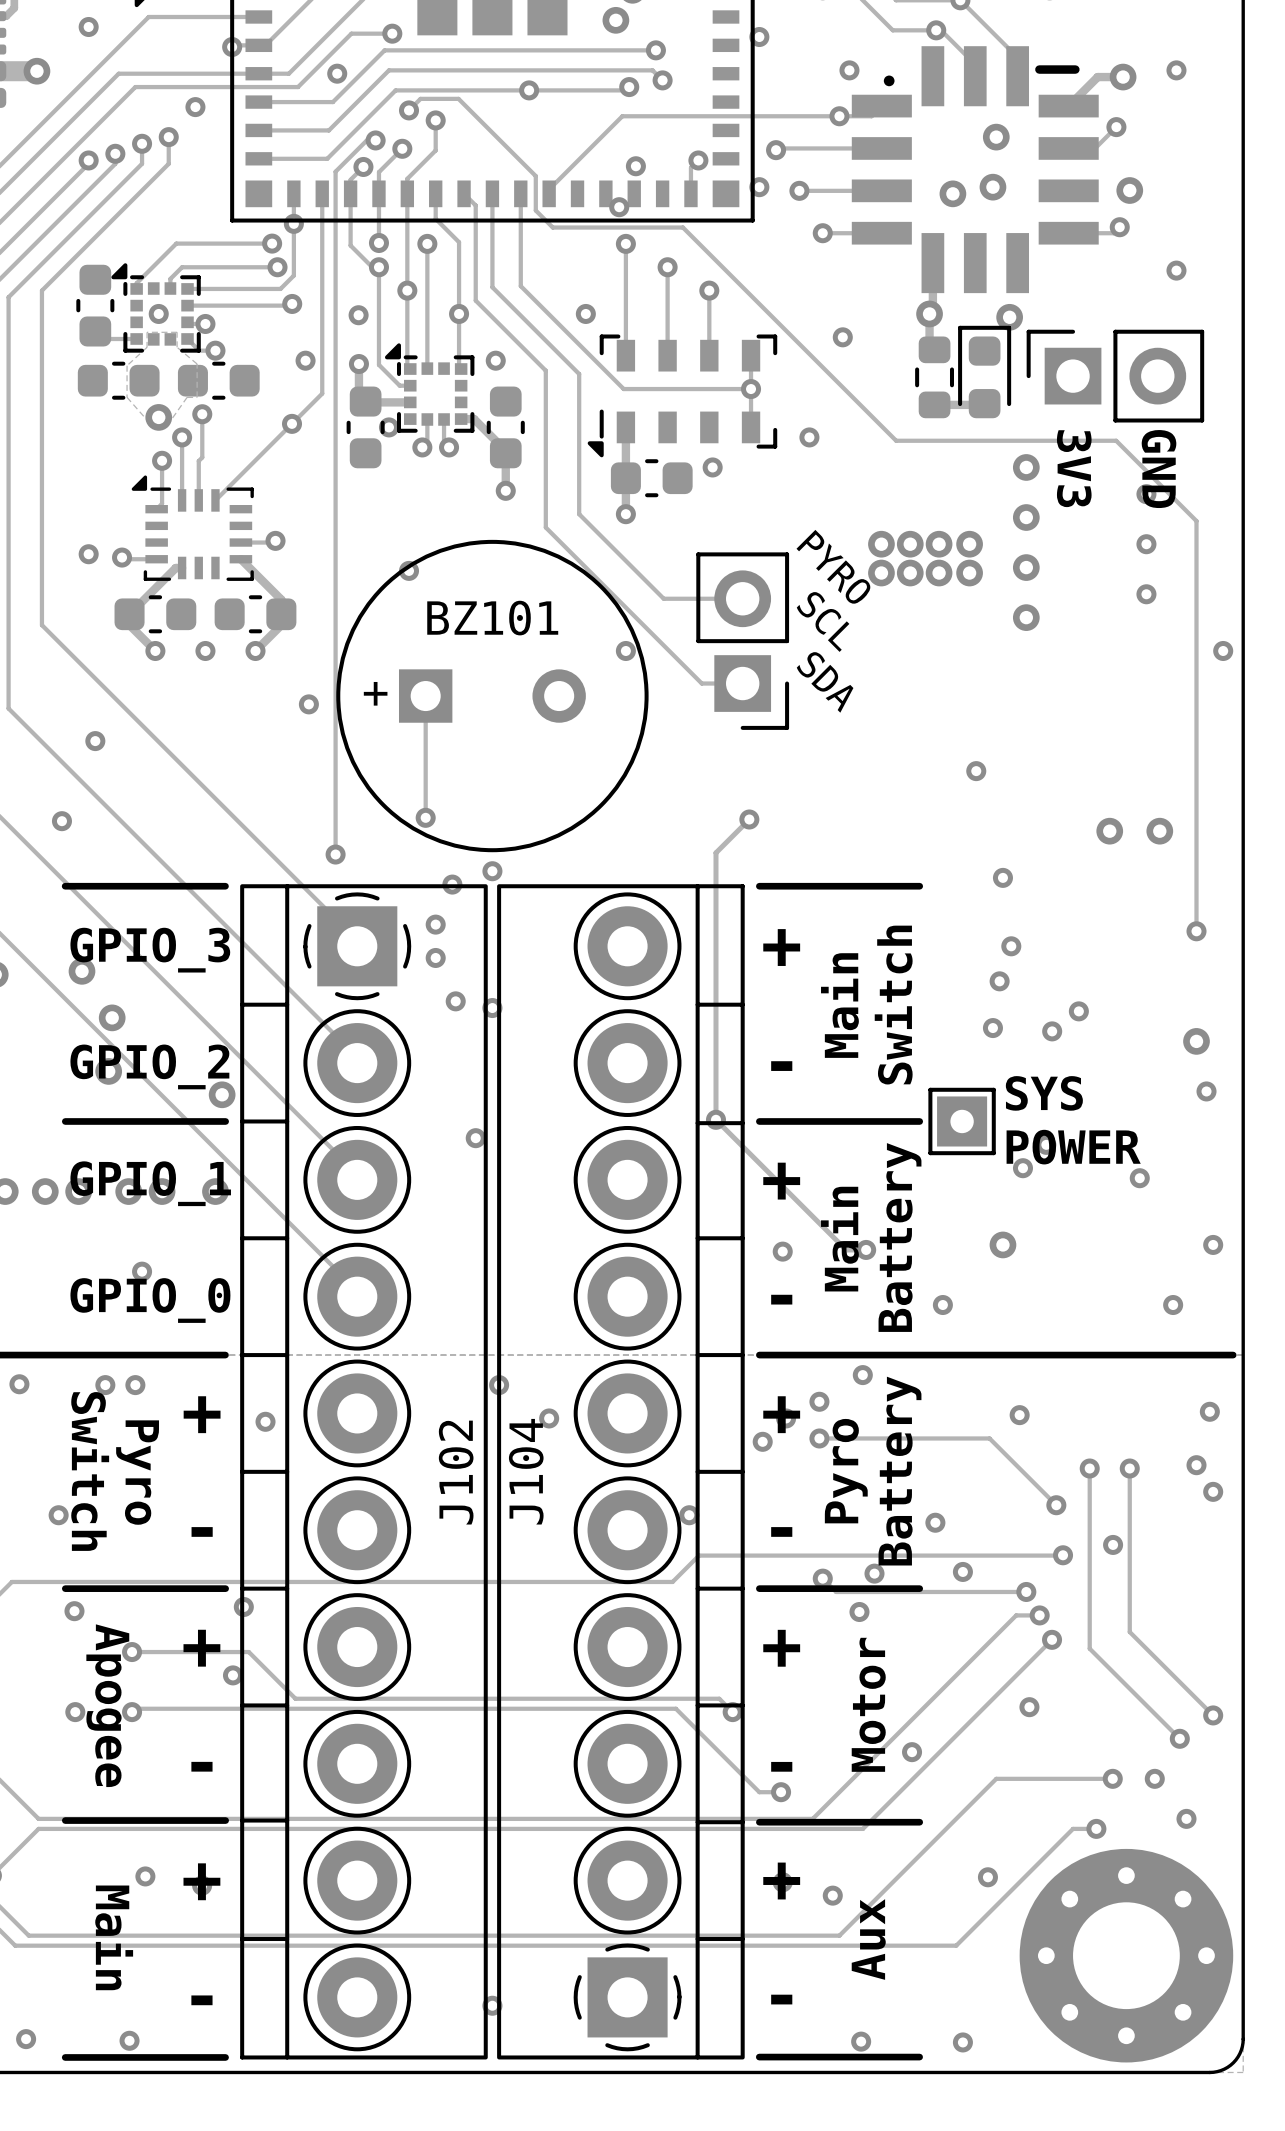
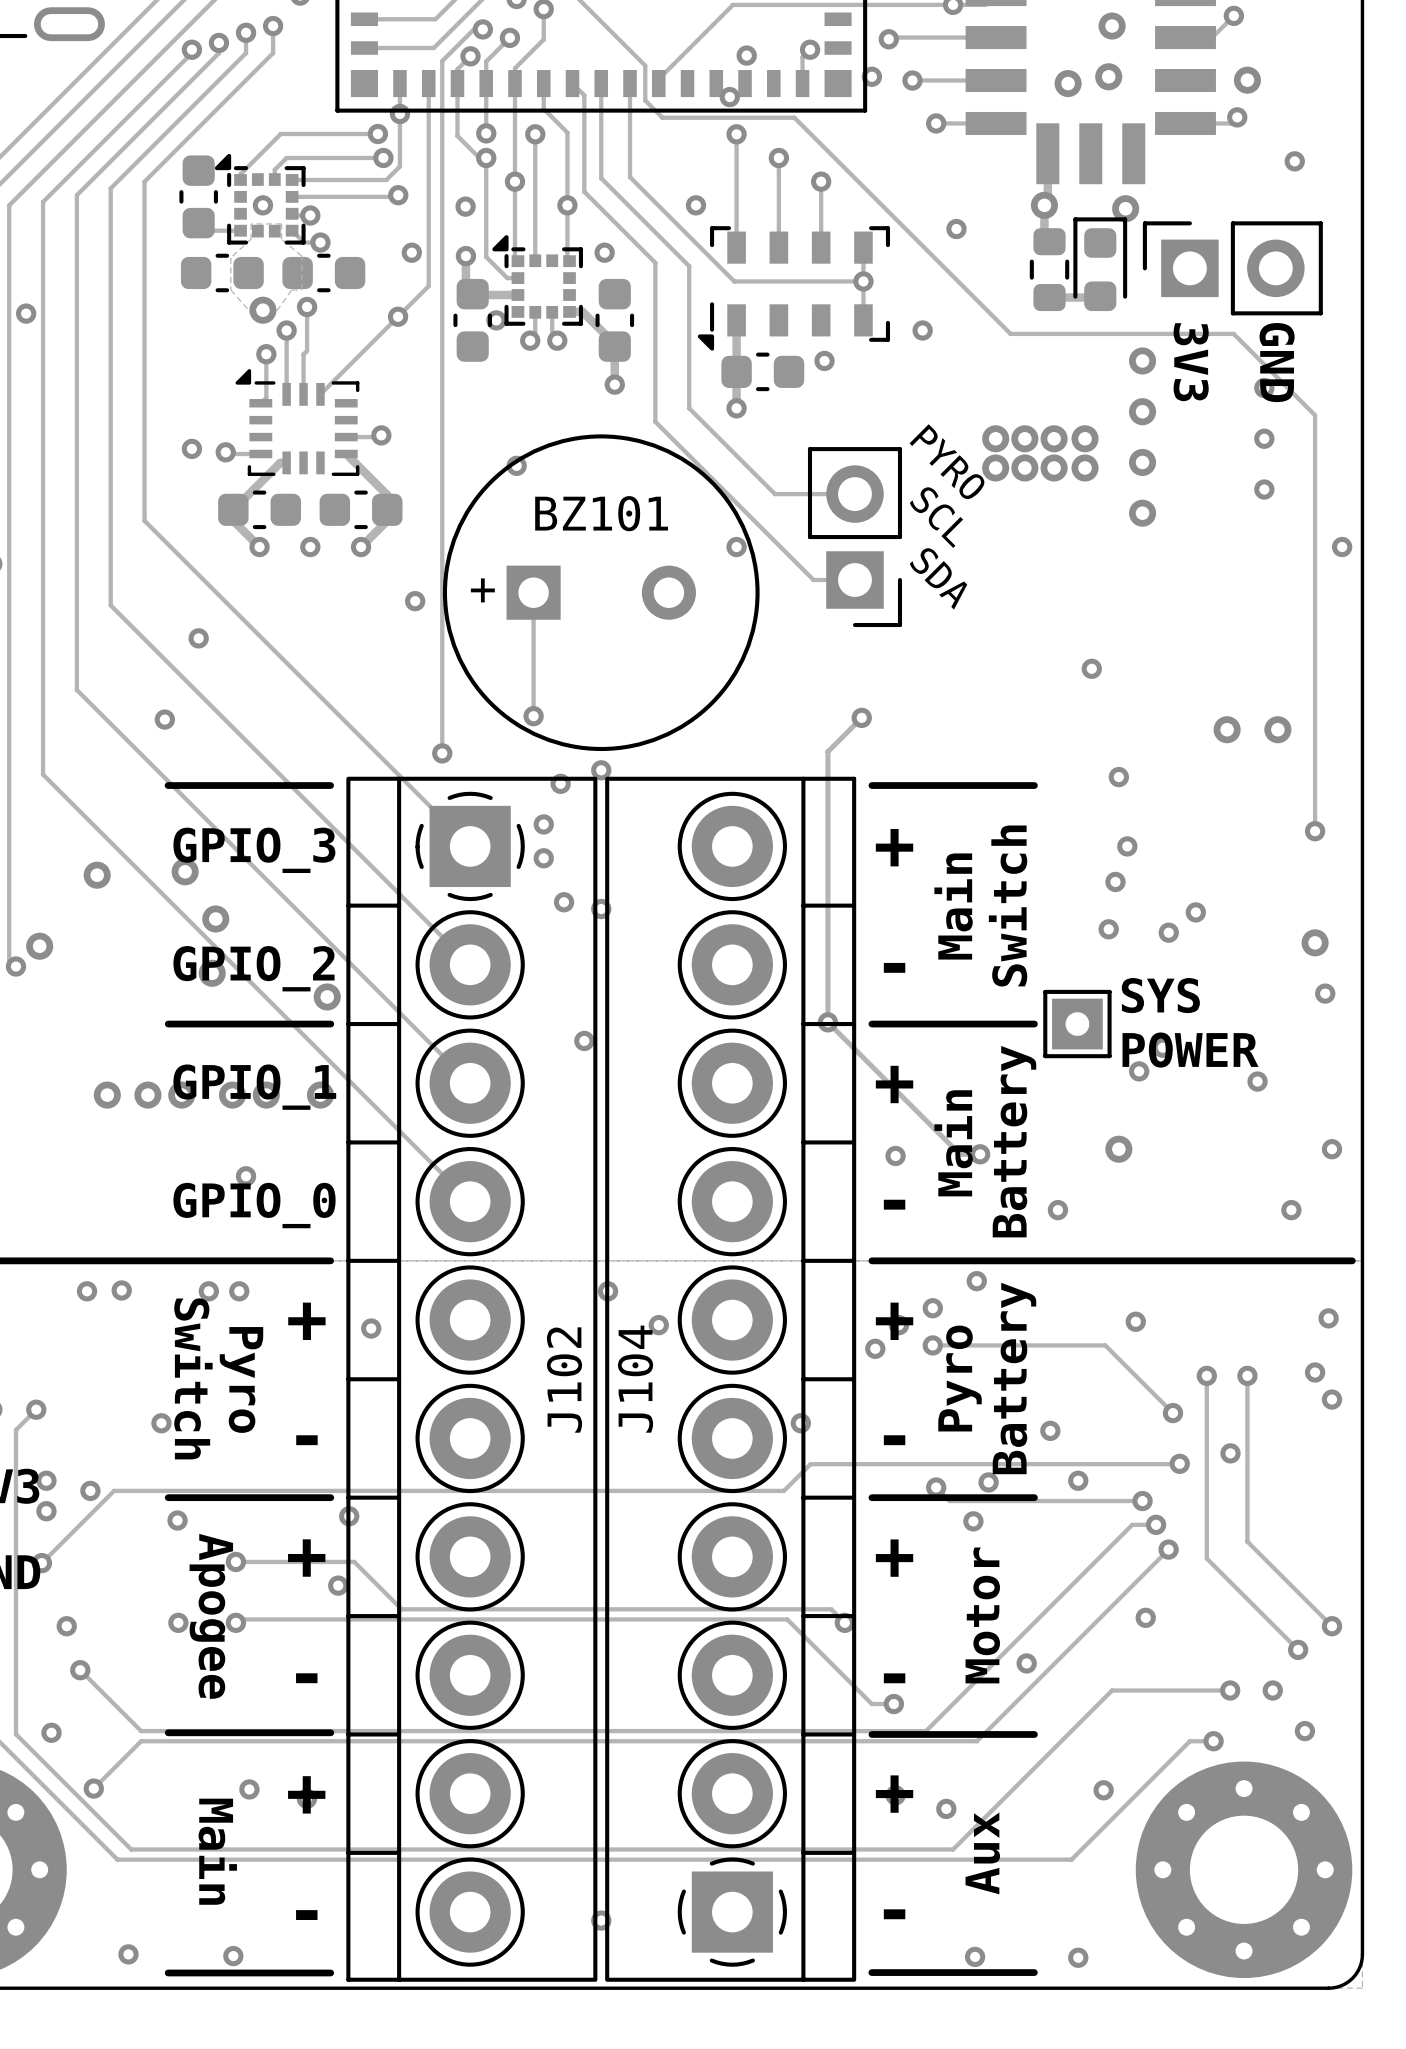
J102 footprint: [240, 884, 488, 2060] -> [346, 776, 598, 1982]
J104 footprint: [497, 884, 745, 2060] -> [605, 776, 857, 1982]

